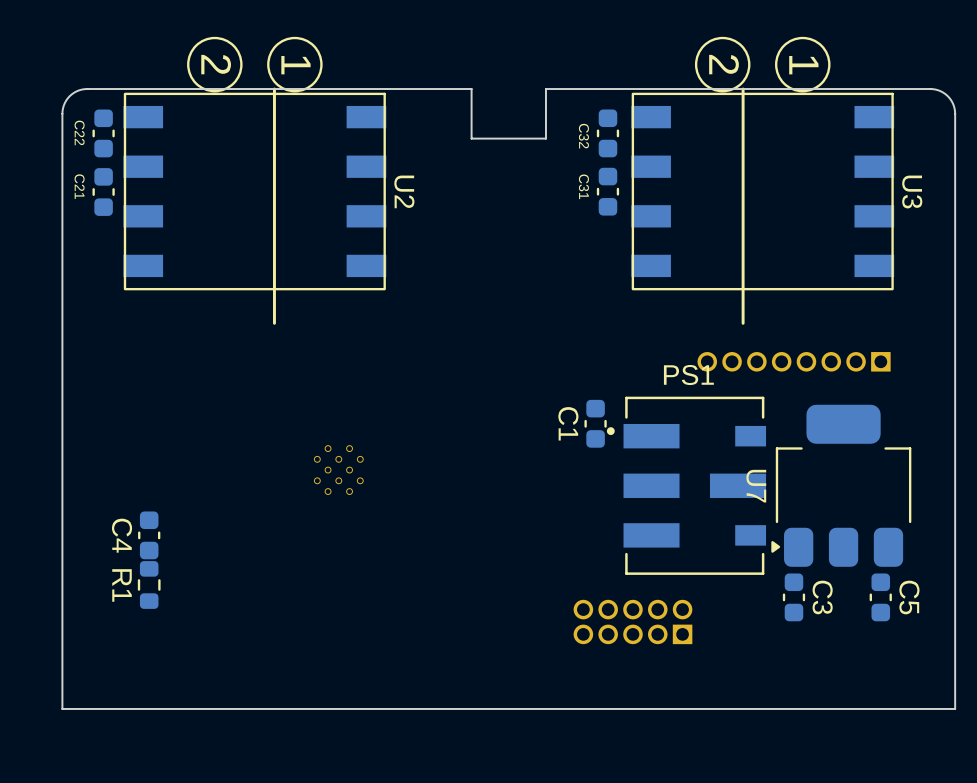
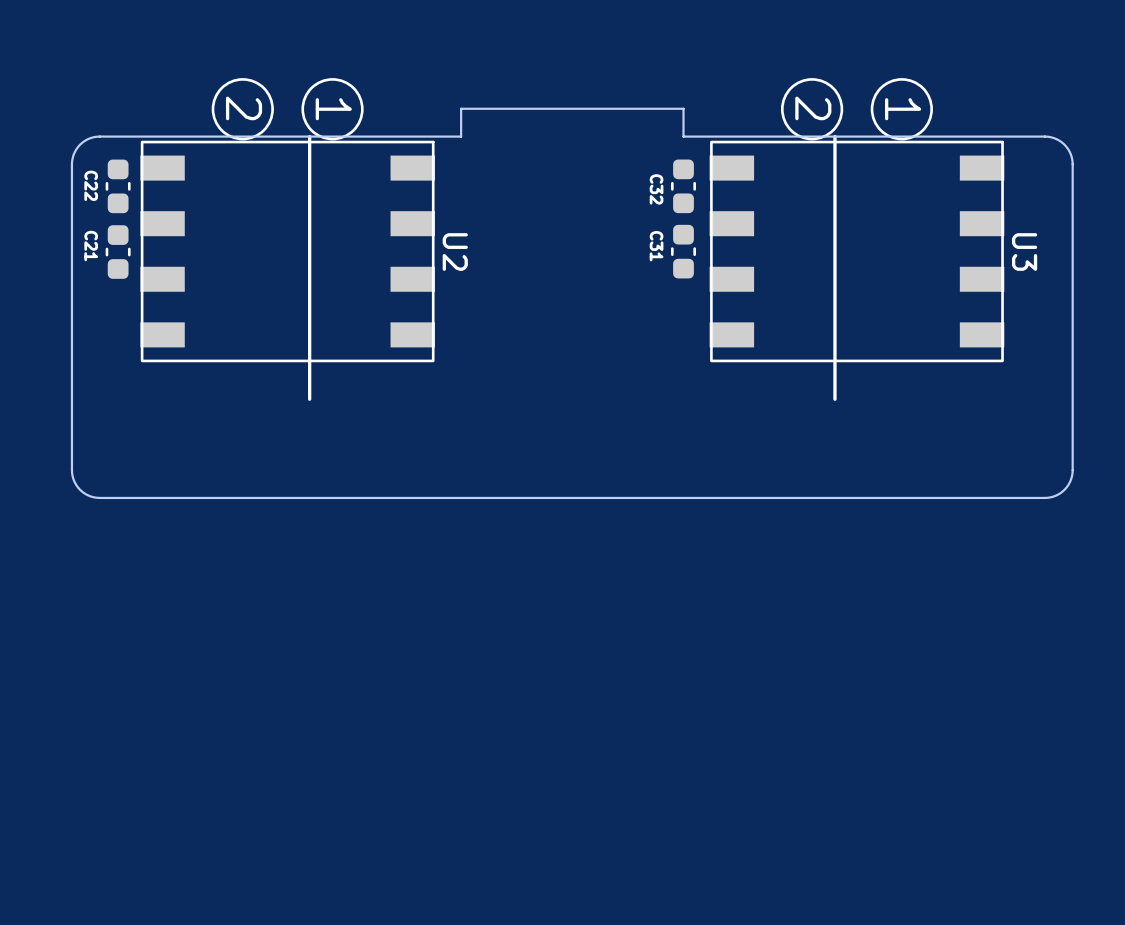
board edge: (607, 89) (545, 89) (545, 138) (471, 138) (471, 89) (409, 89) -> (683, 136) (683, 108) (461, 108) (461, 136)
part: (794, 361) -> none
board edge: (955, 386) (955, 708) (62, 708) (62, 386) -> (1072, 470) (1069, 482) (1064, 489) (1054, 496) (1044, 497) (99, 497) (87, 495) (80, 489) (74, 482) (71, 470)
C1: (595, 423) -> none
part: (338, 470) -> none
PS1: (686, 485) -> none
U7: (841, 485) -> none
C4: (149, 535) -> none
R1: (149, 584) -> none
C3: (793, 597) -> none
C5: (880, 597) -> none
part: (632, 621) -> none

